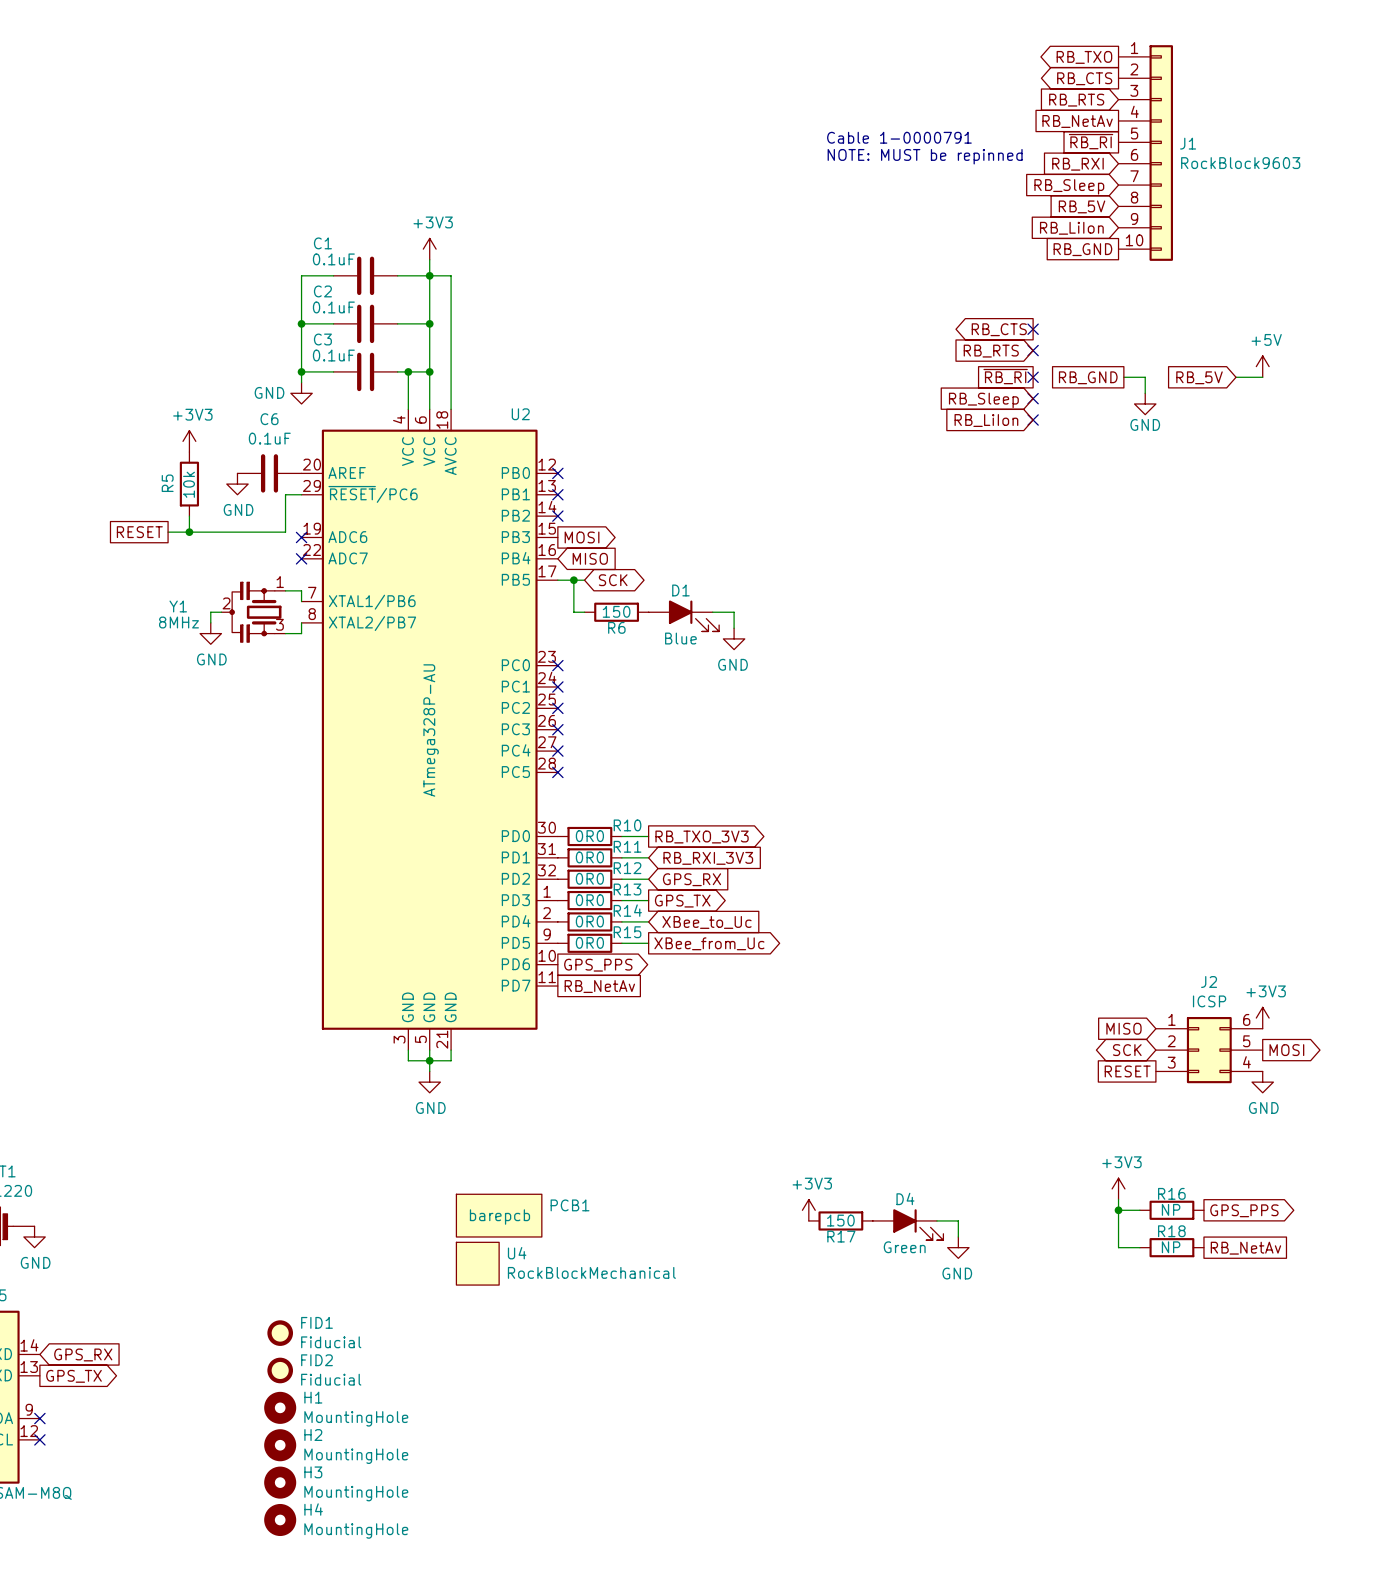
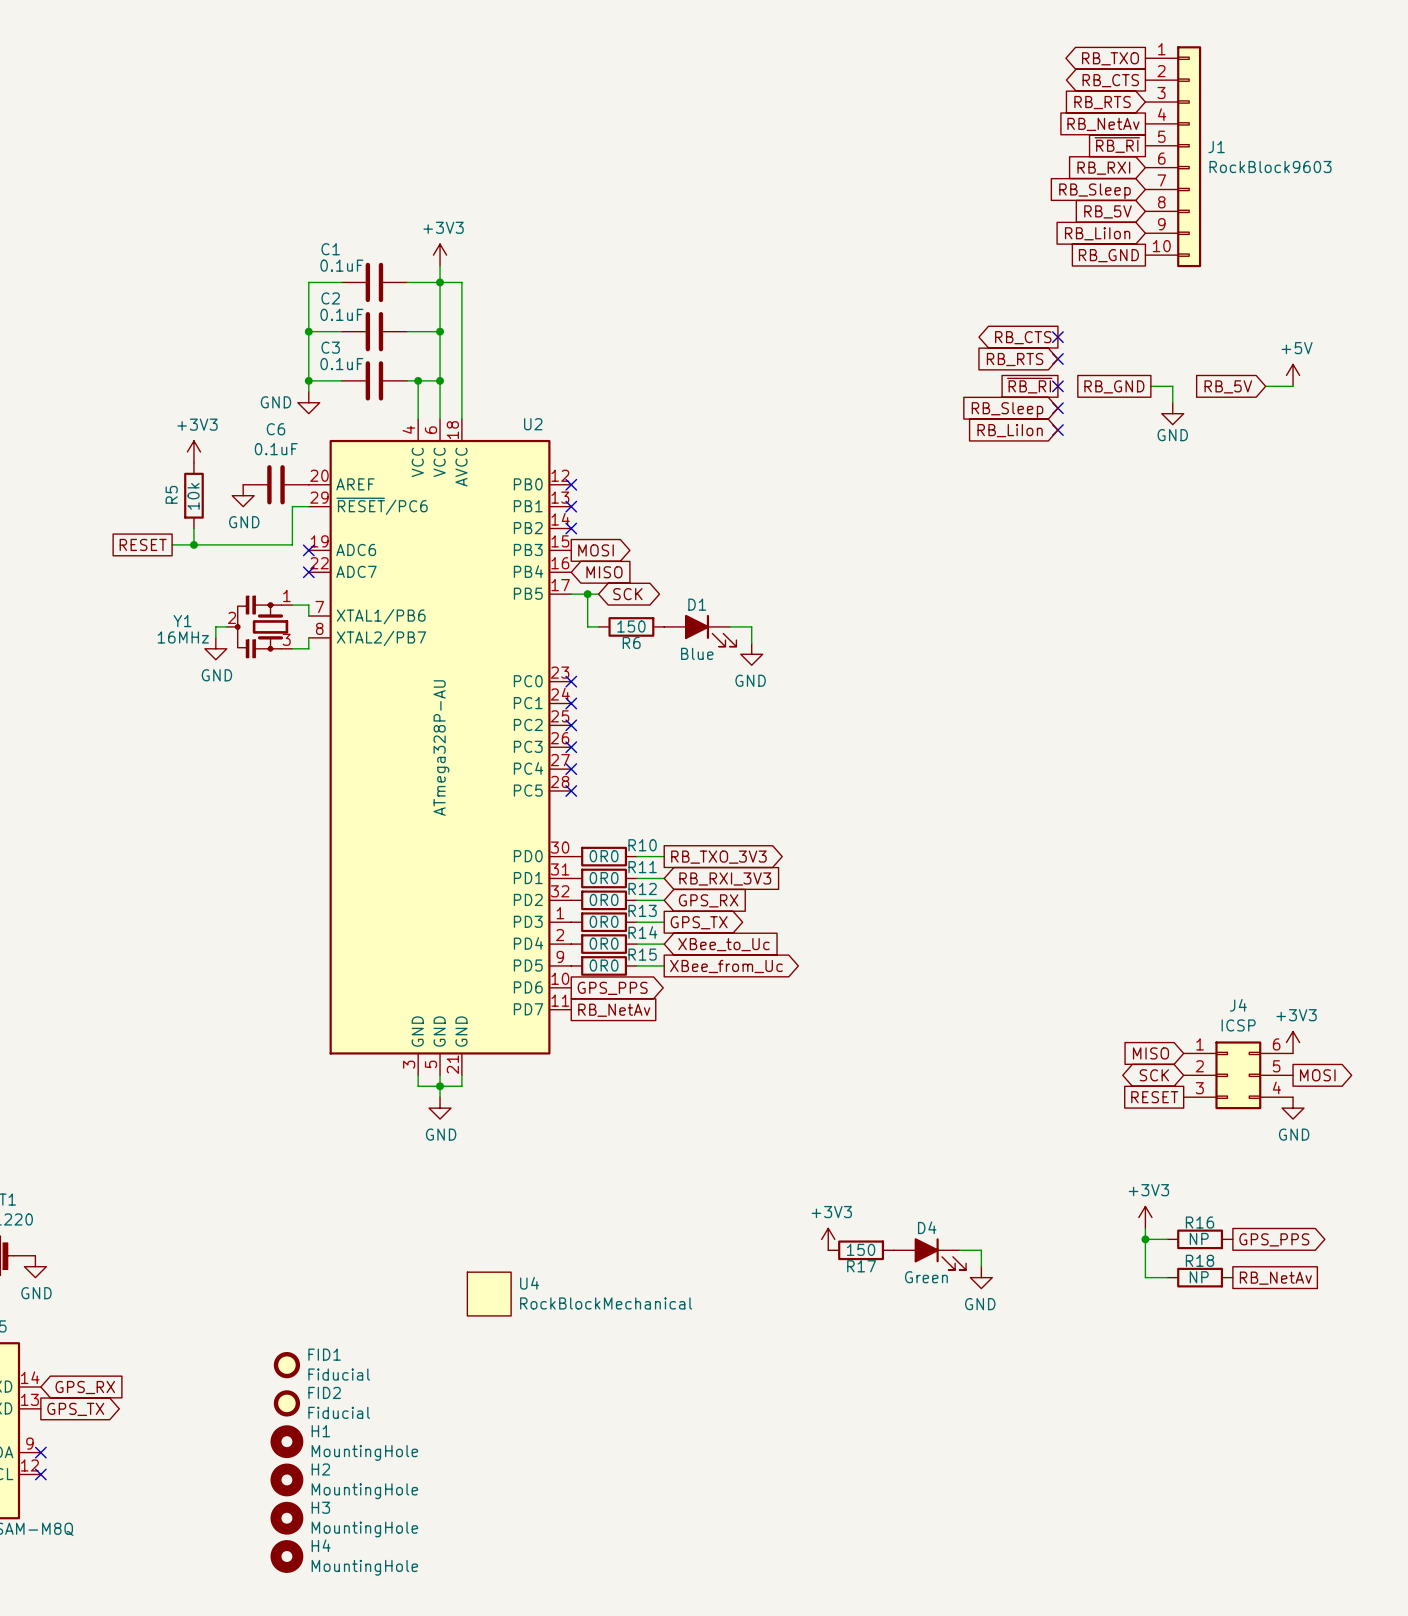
text: Cable 1-0000791 (899, 137) -> none
text: NOTE: MUST be repinned (925, 156) -> none
Y1 value: 8MHz (178, 622) -> 16MHz (183, 637)
J2 name: J2 (1209, 981) -> J4 (1238, 1005)
PCB1: barepcb (499, 1215) -> none

